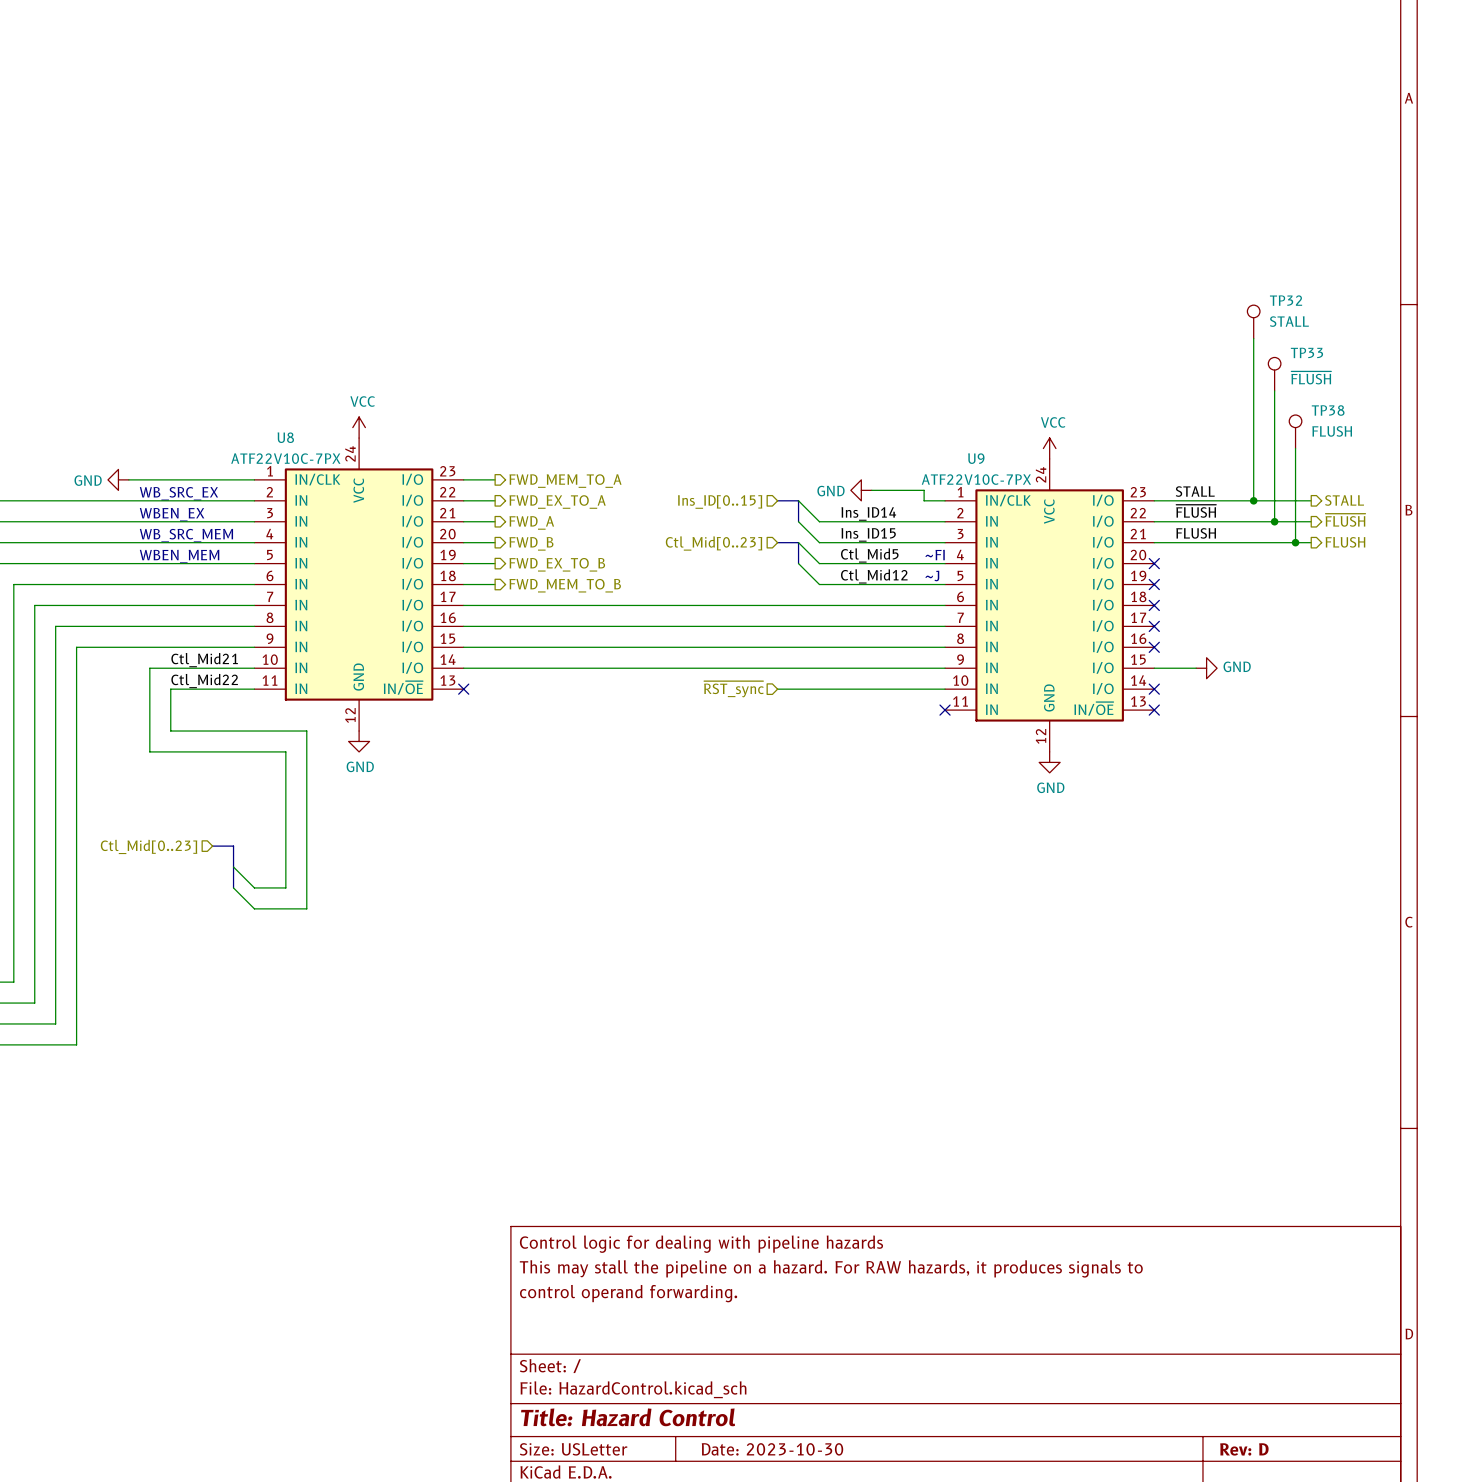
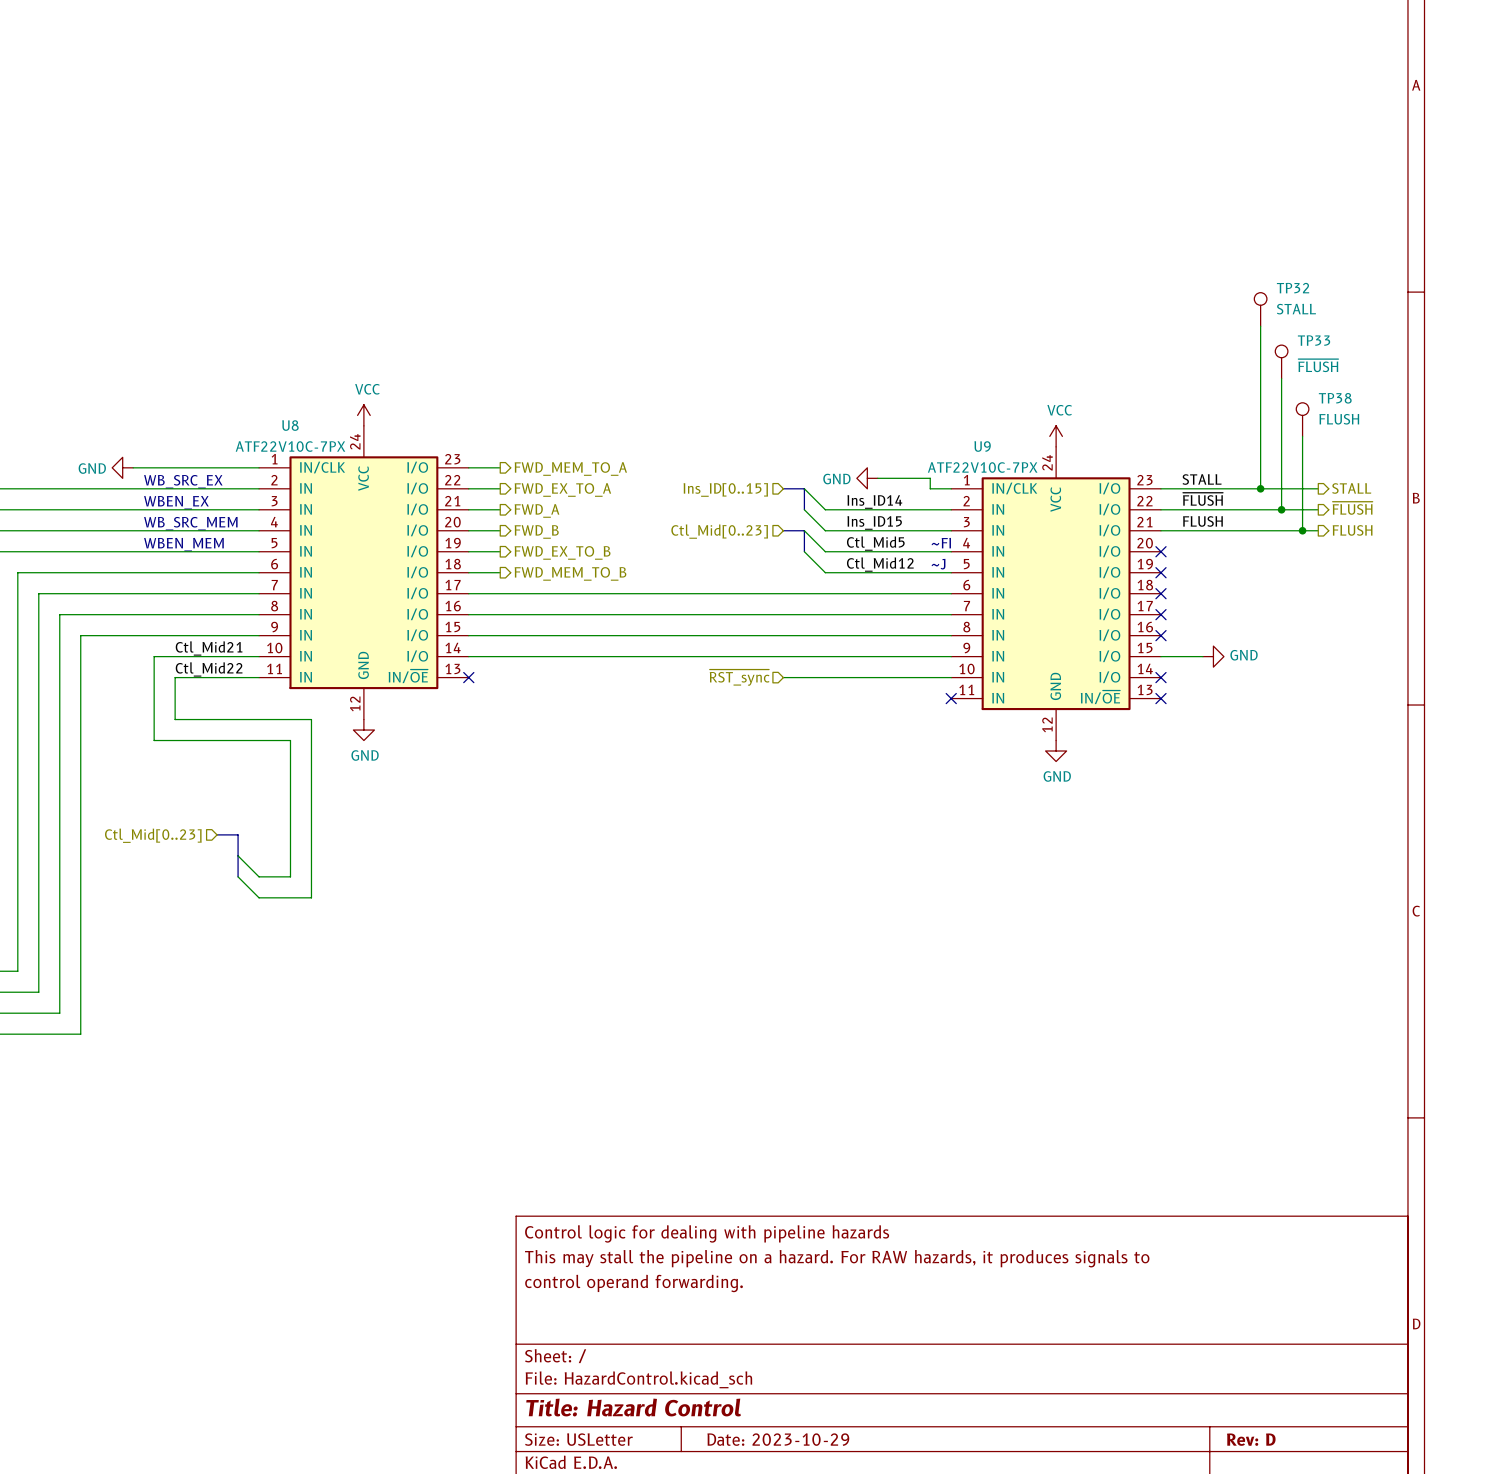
title block: Date: 2023-10-30 (772, 1449) -> Date: 2023-10-29 (778, 1439)

